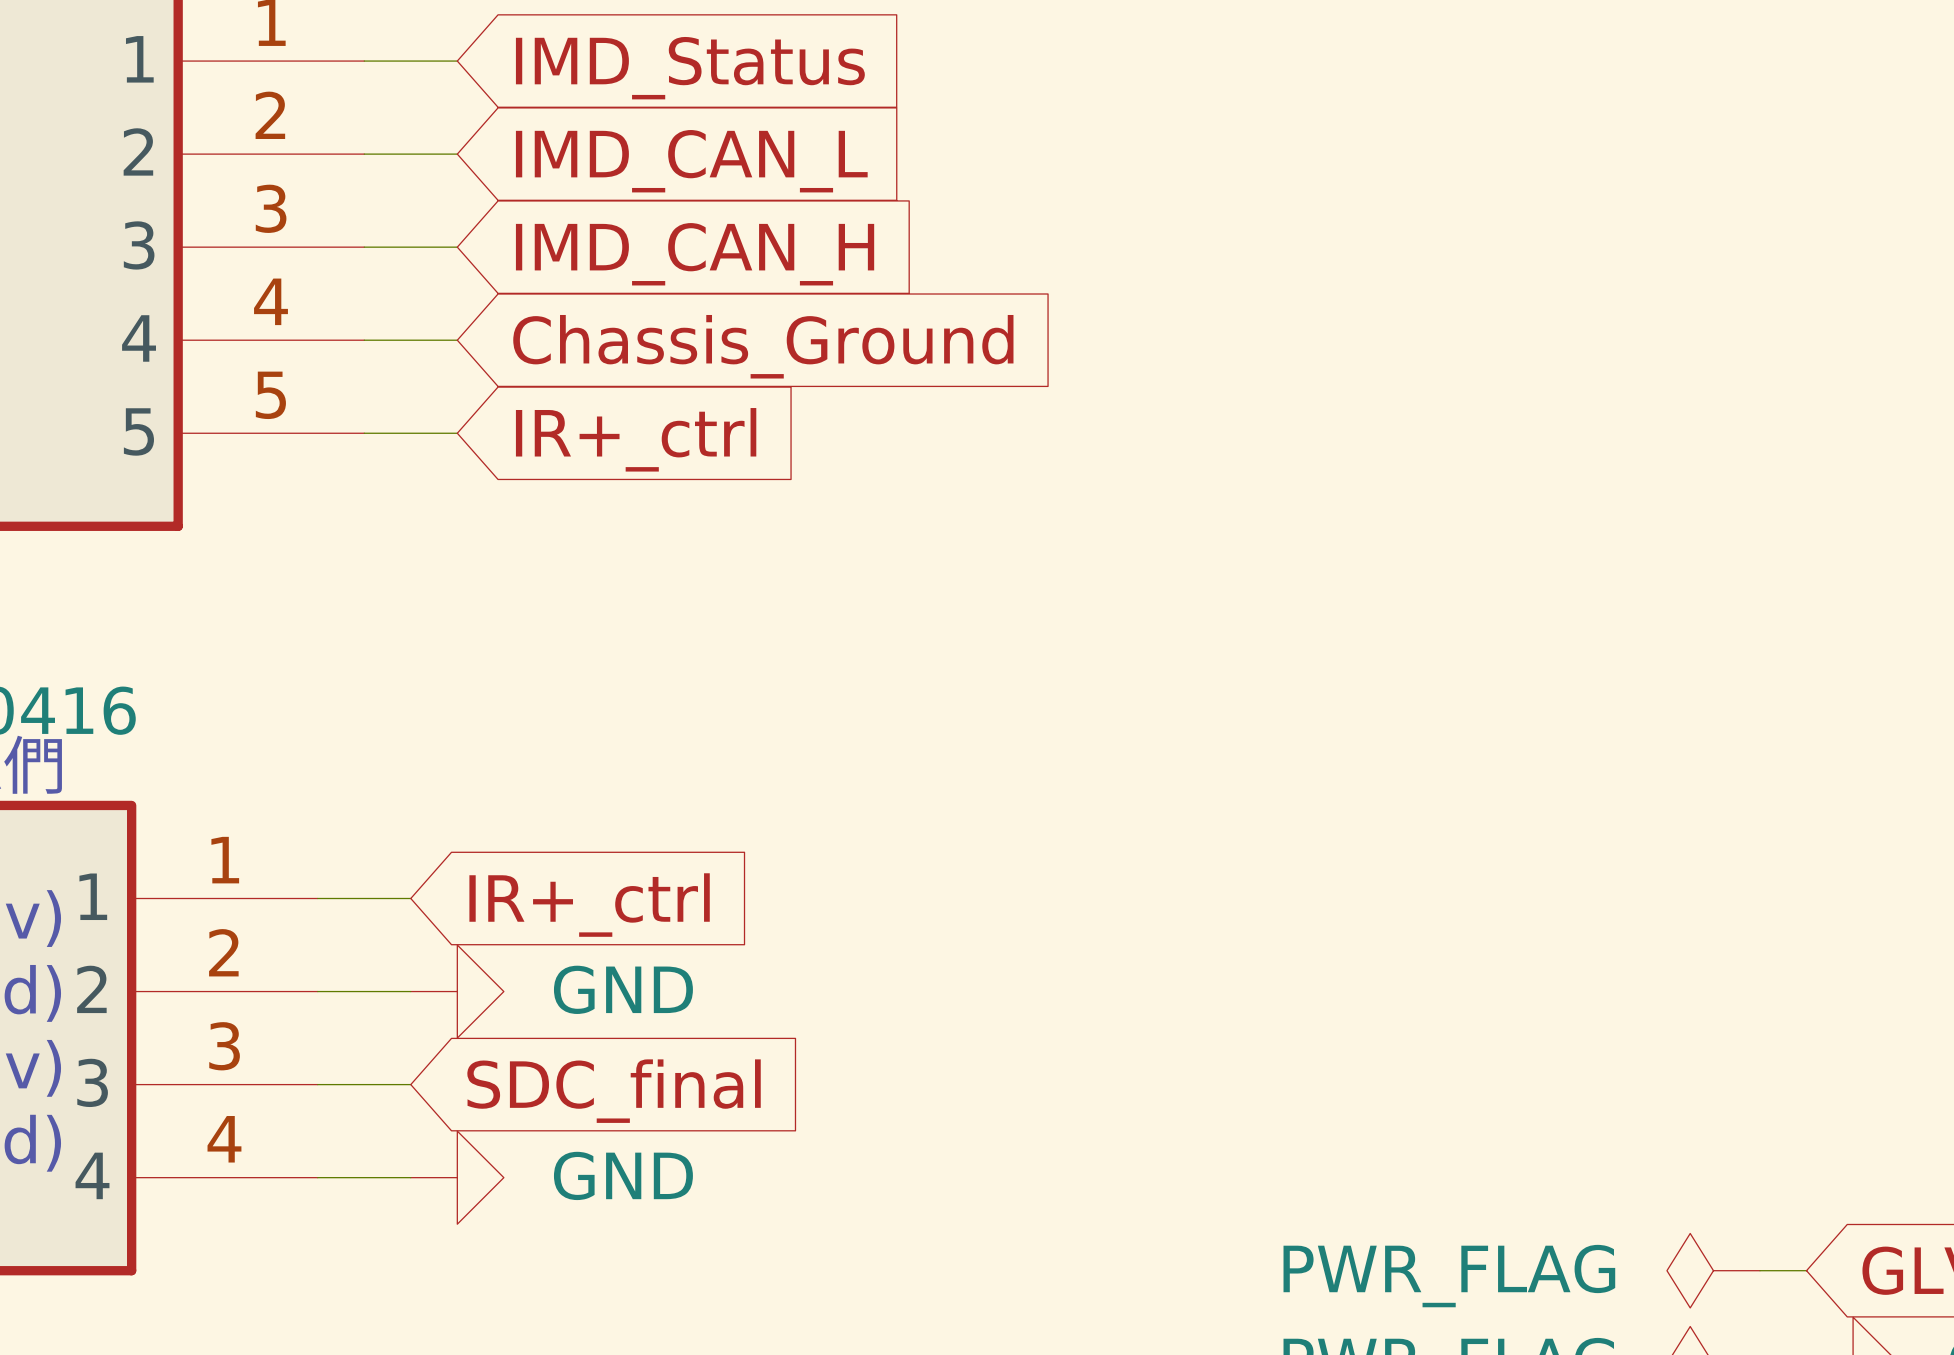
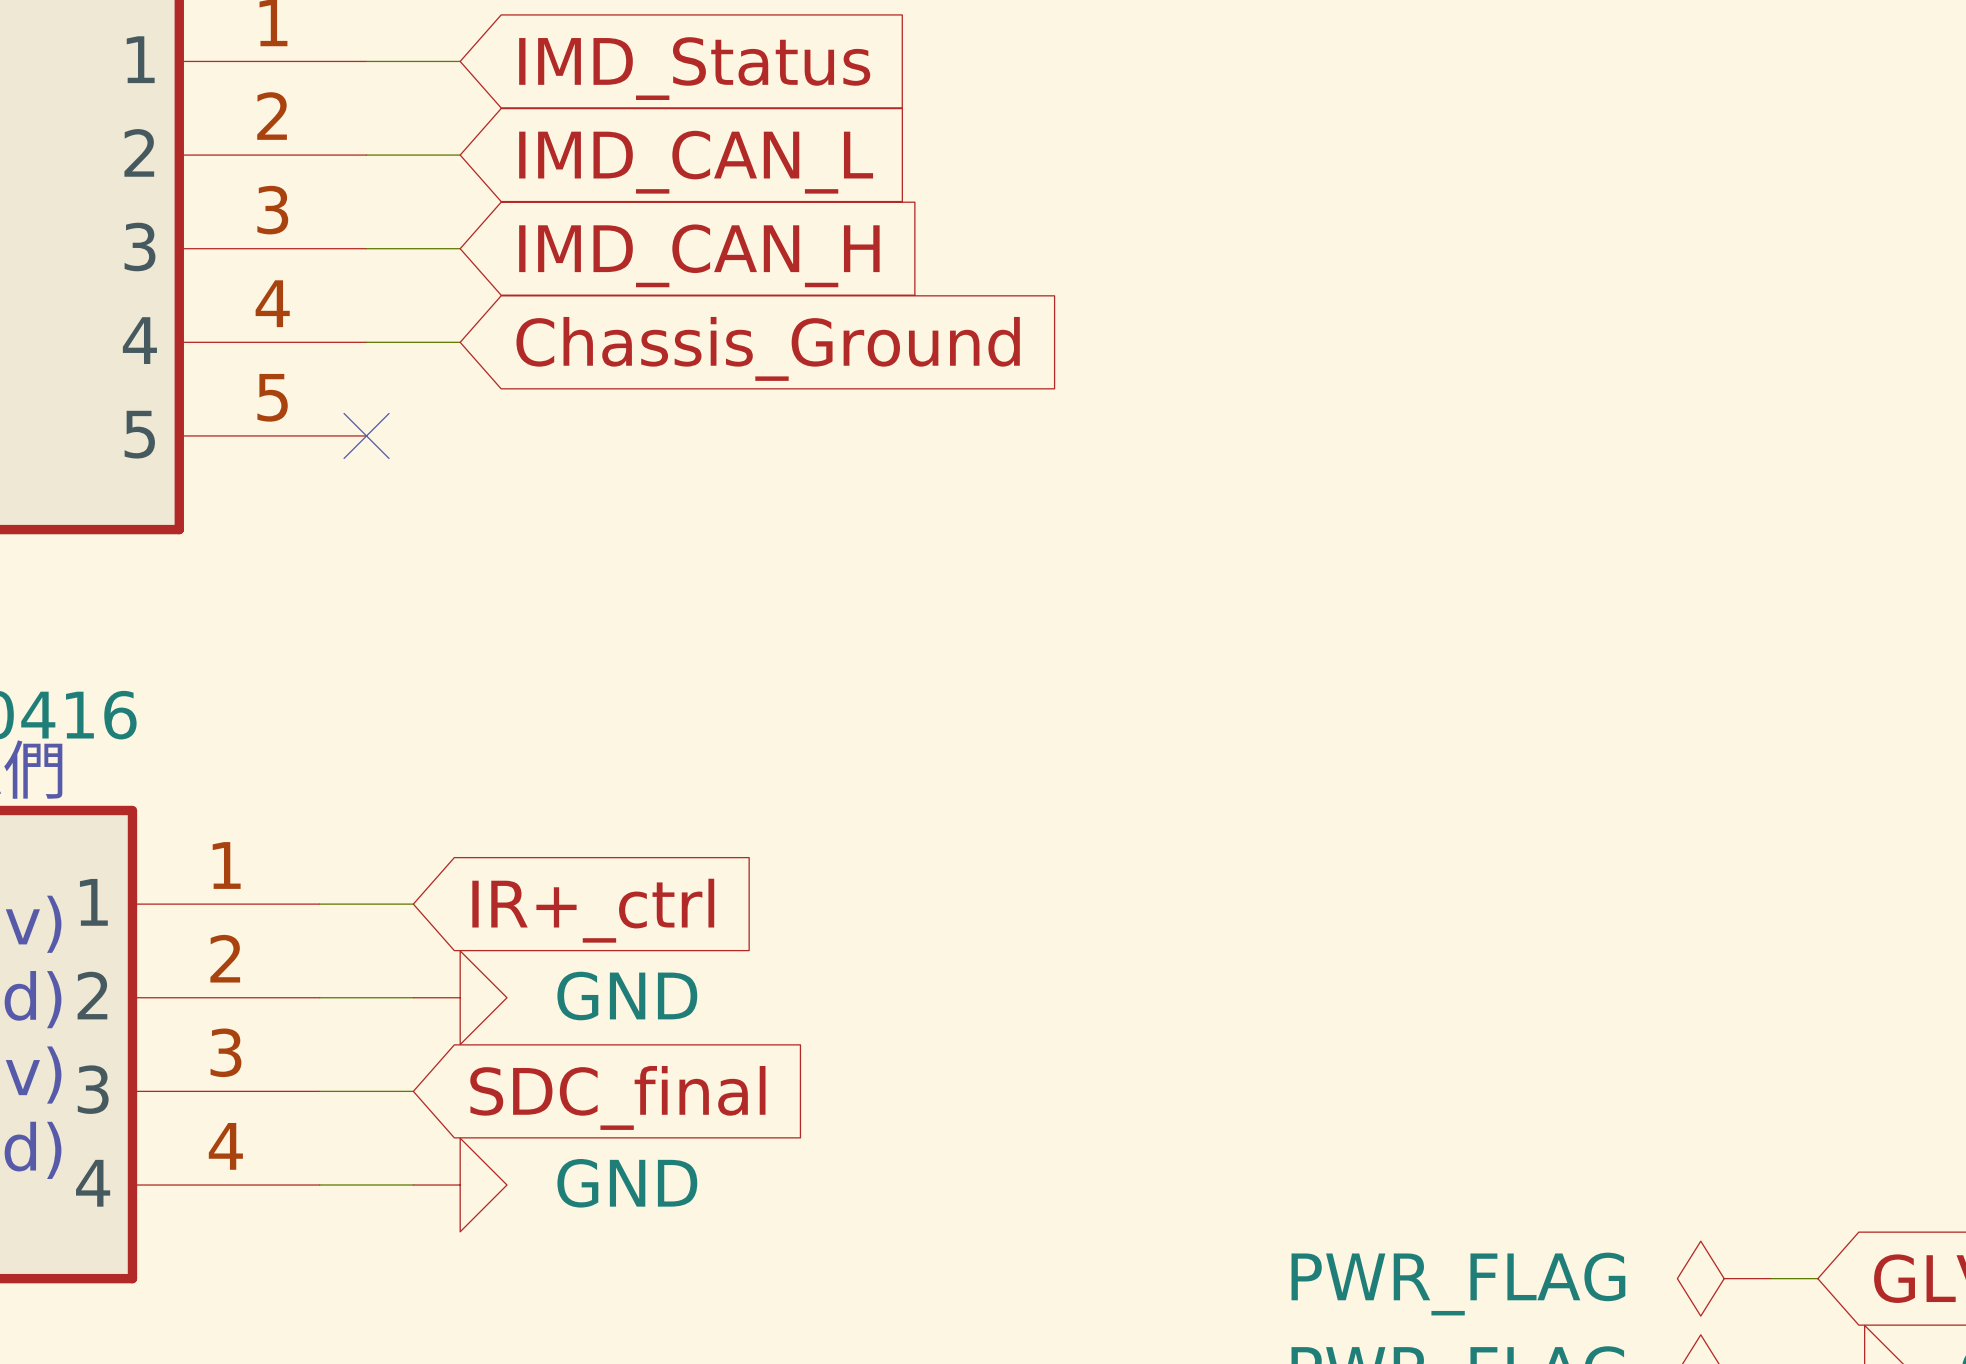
wire: (364, 433) (457, 433) -> none
no-connect mark: none -> (366, 435)
global label: IR+_ctrl (636, 439) -> none

